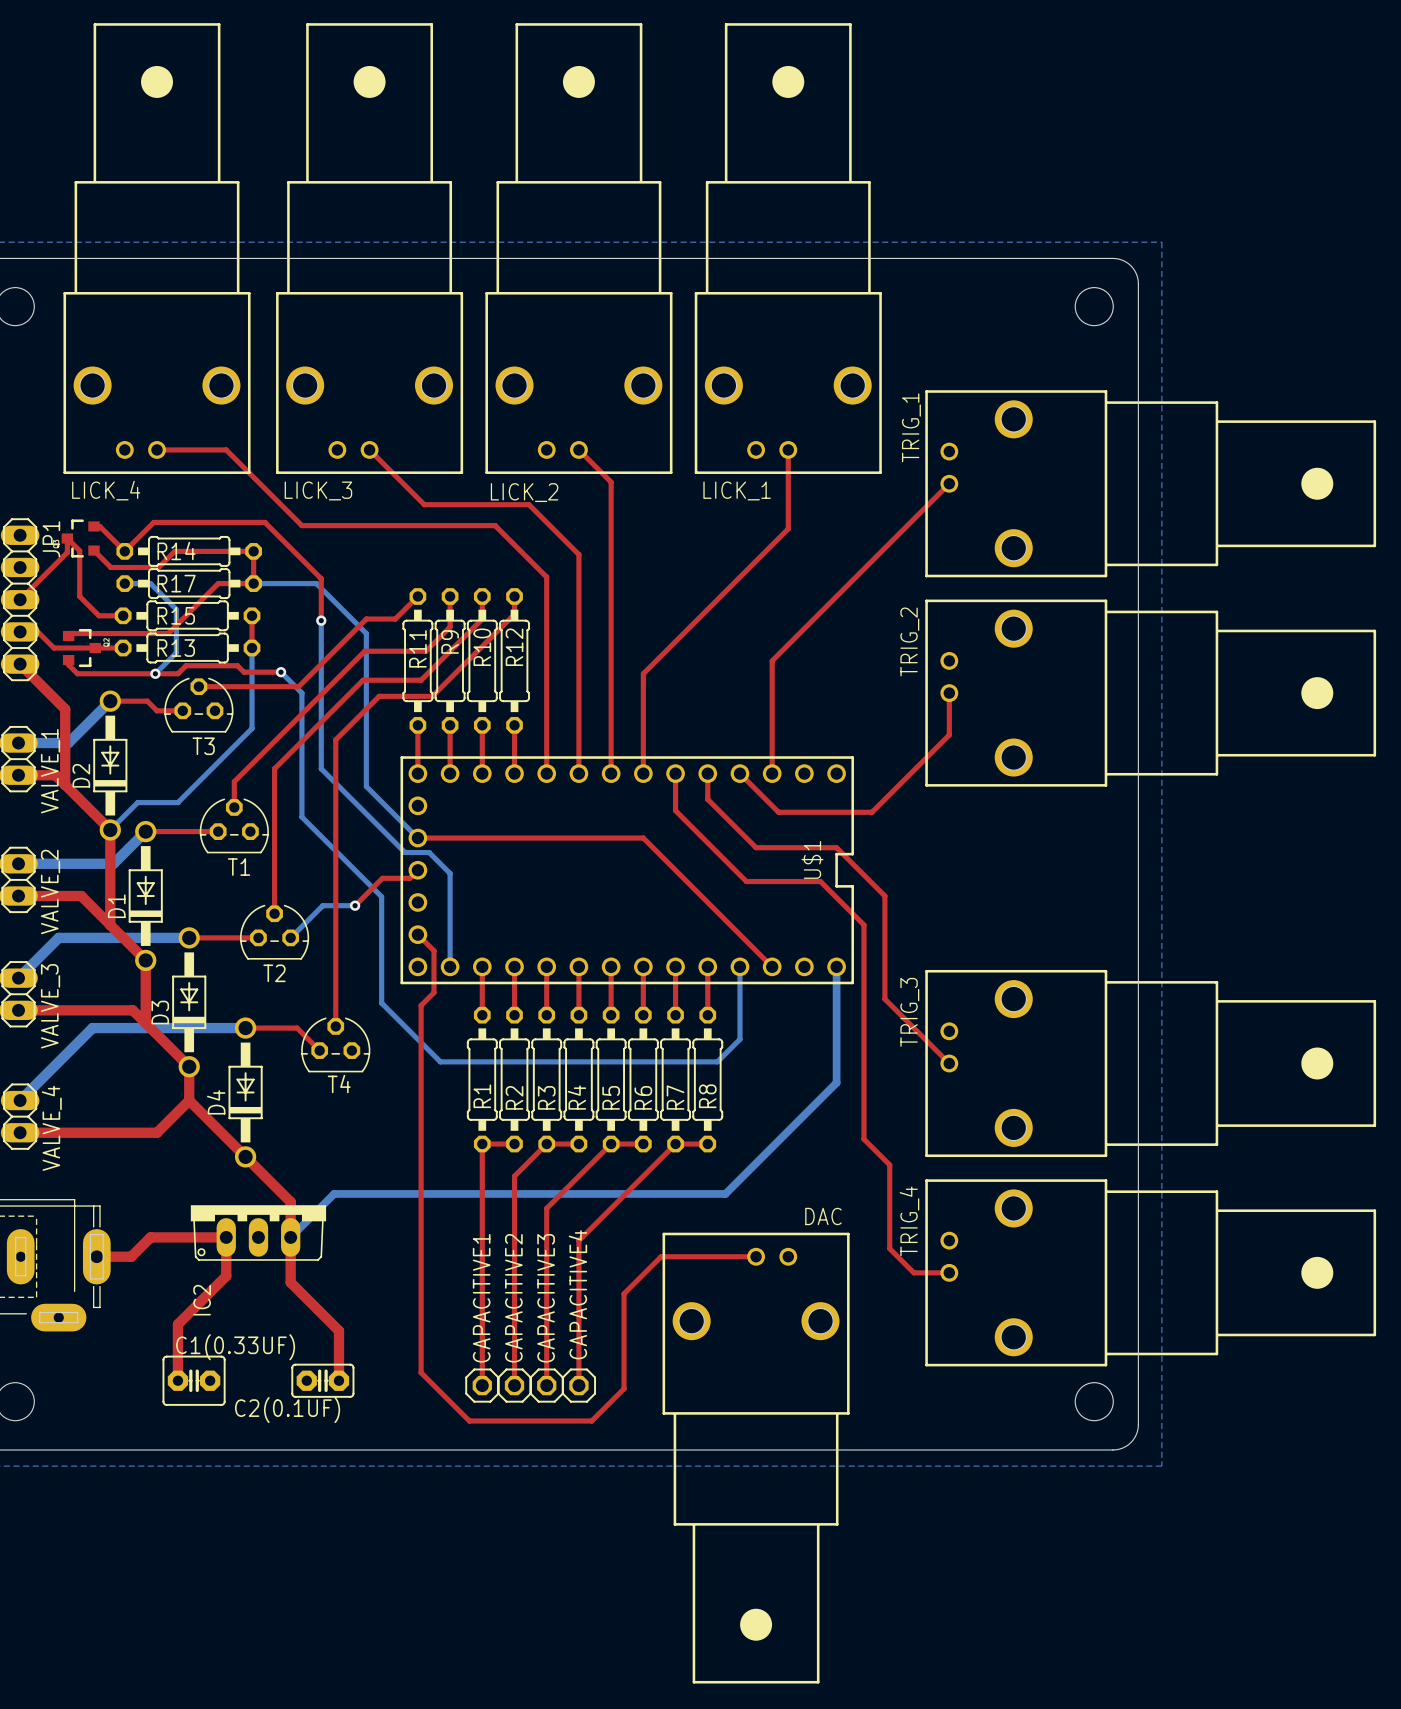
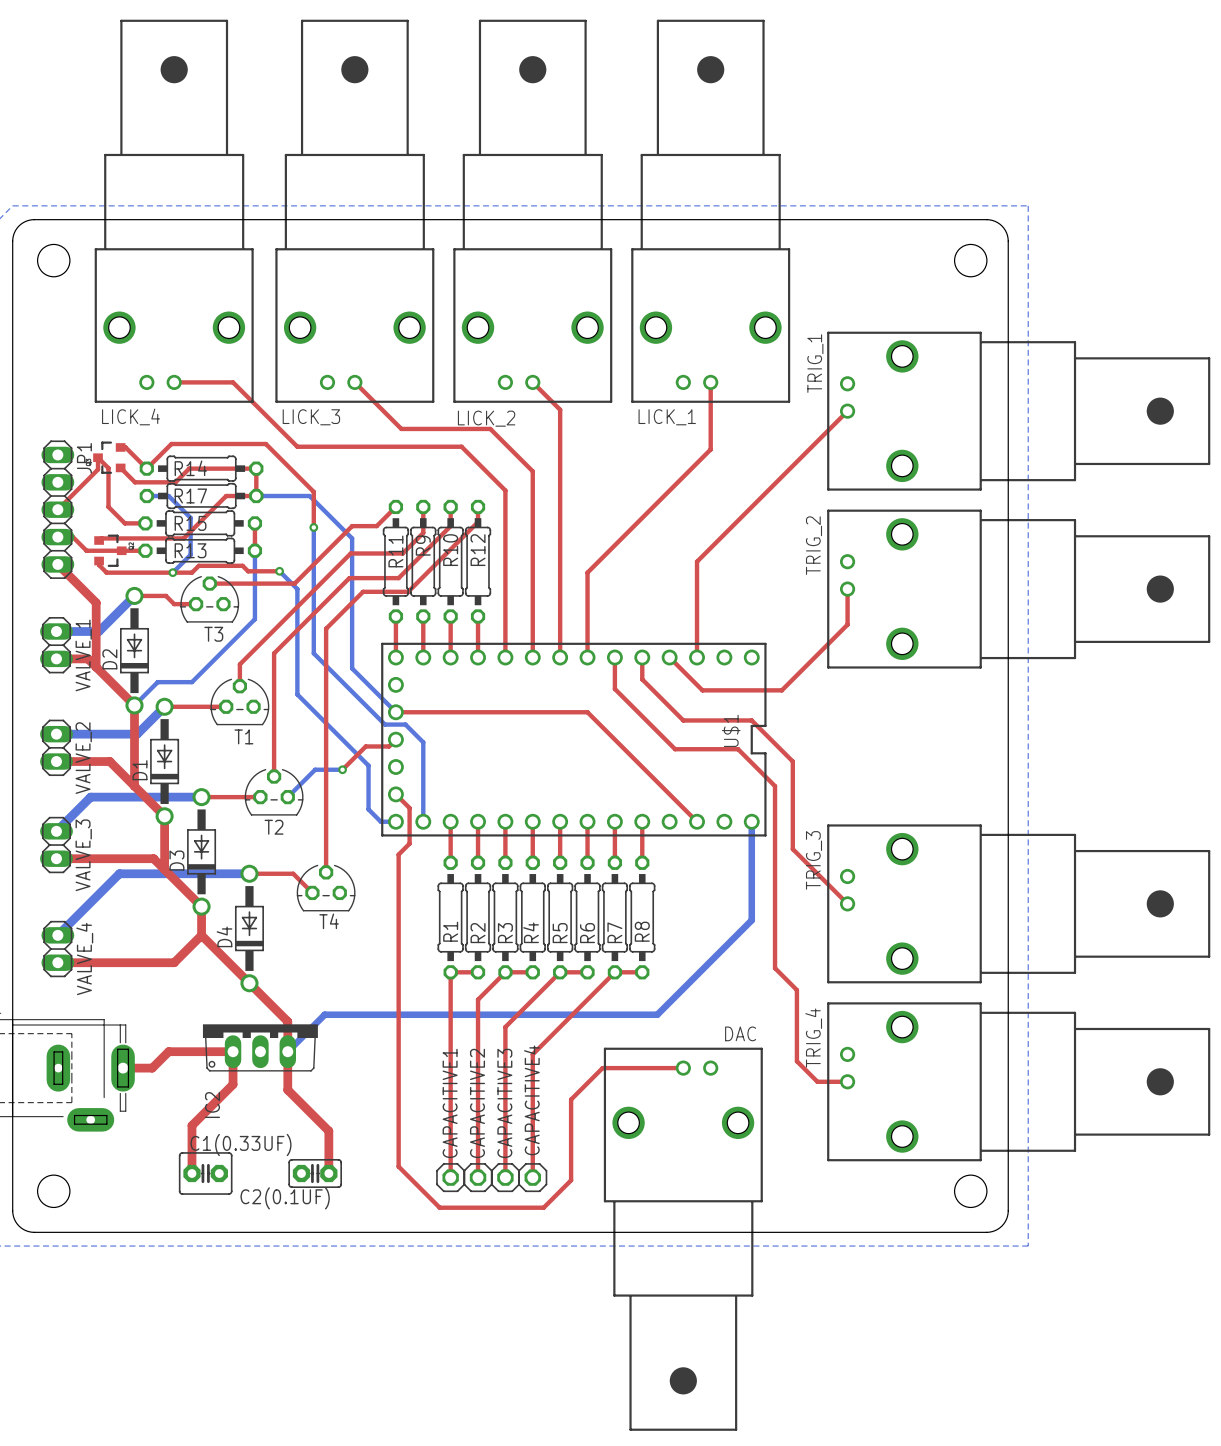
bottom track: (381, 896) (381, 1003) (440, 1061) (717, 1061) (739, 1039) (739, 966) -> (365, 762) (368, 765) (368, 809) (380, 821) (395, 821)

